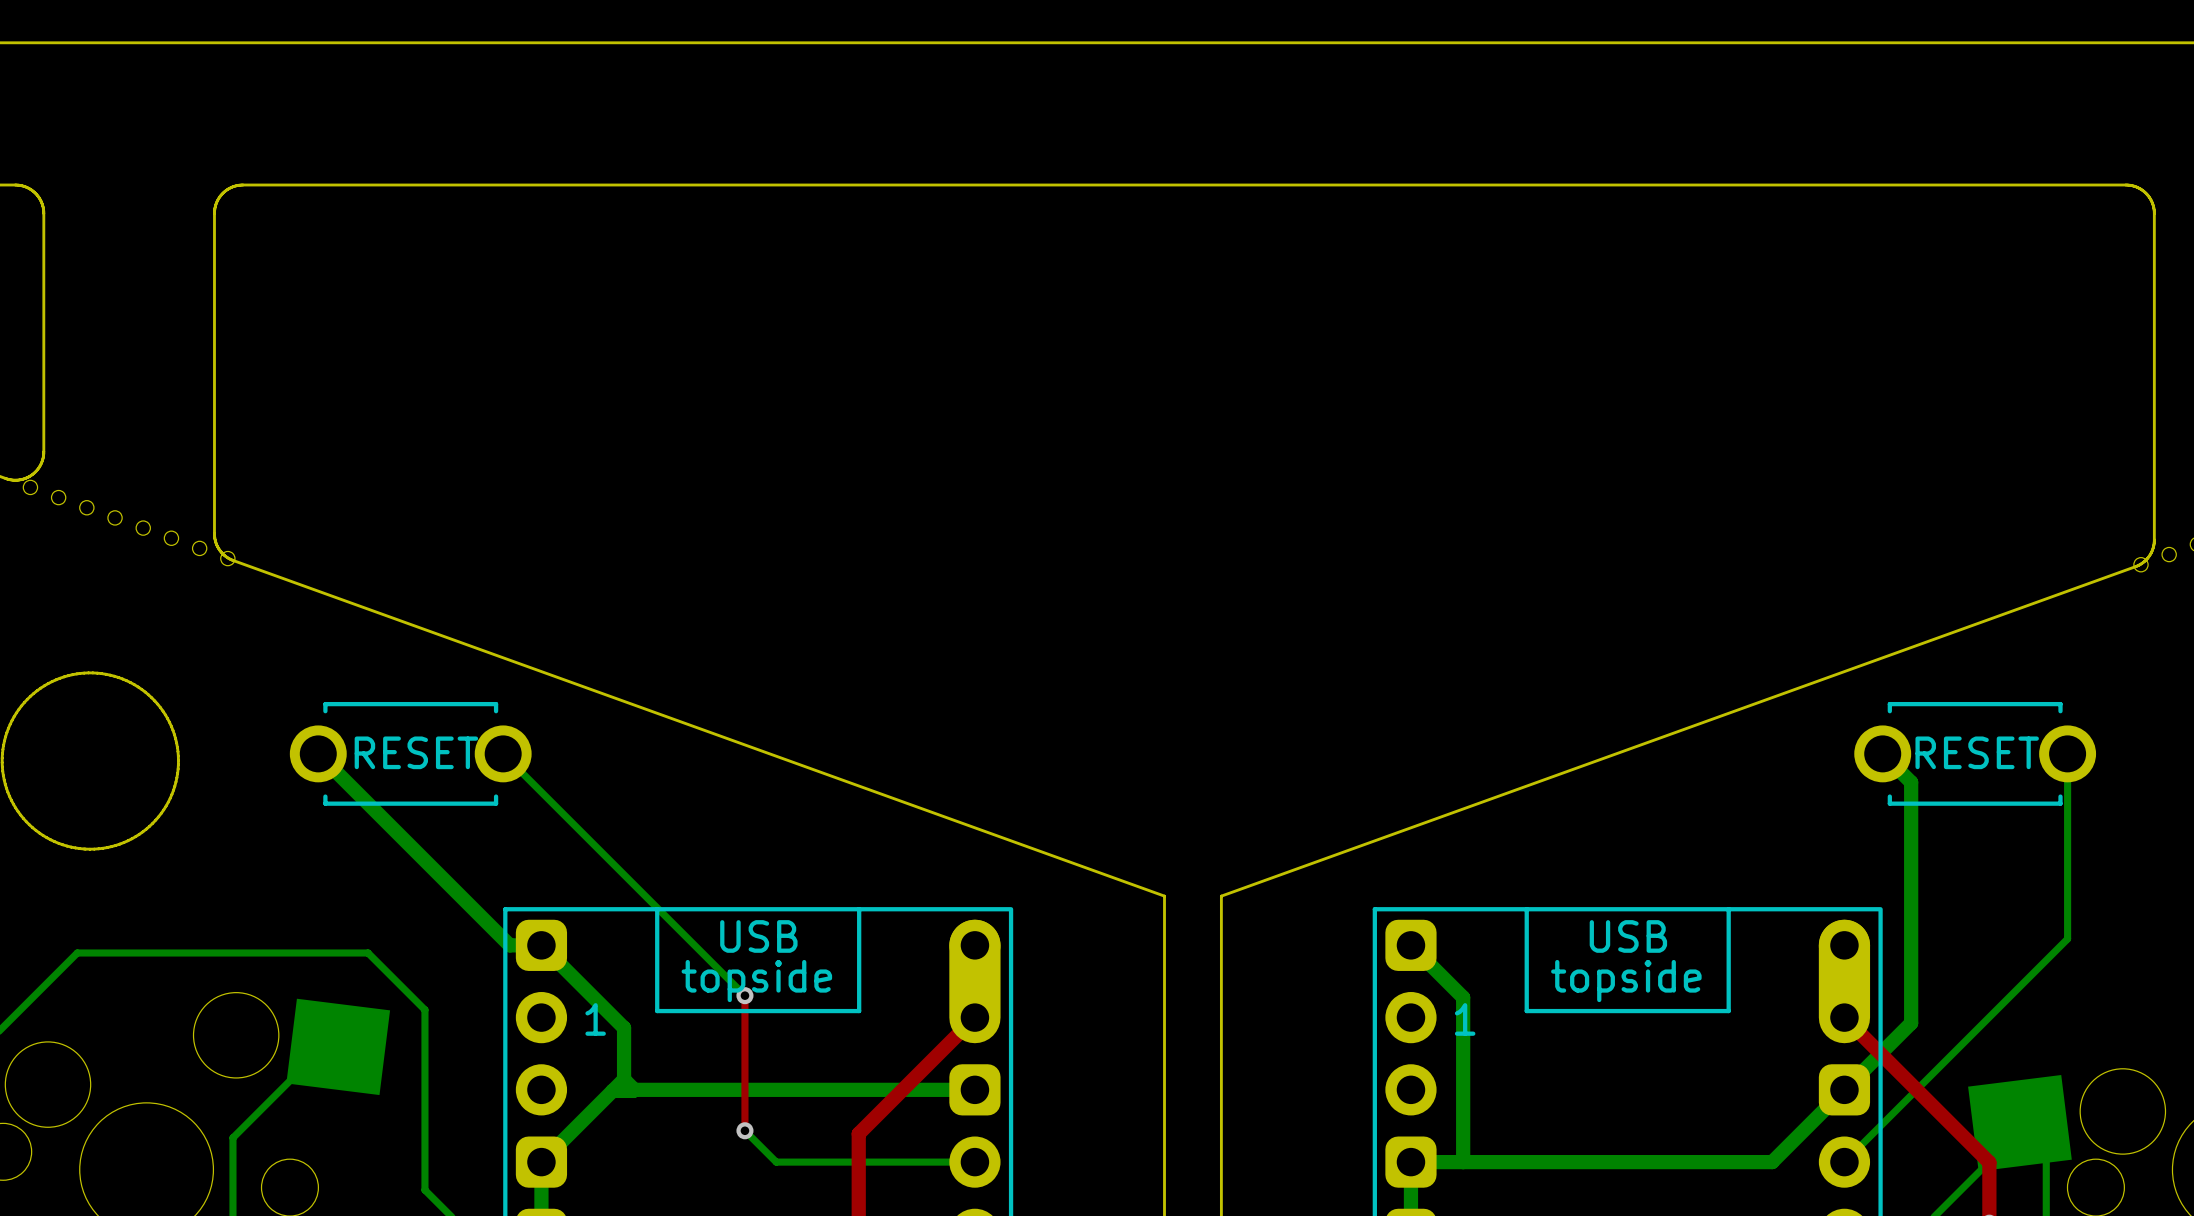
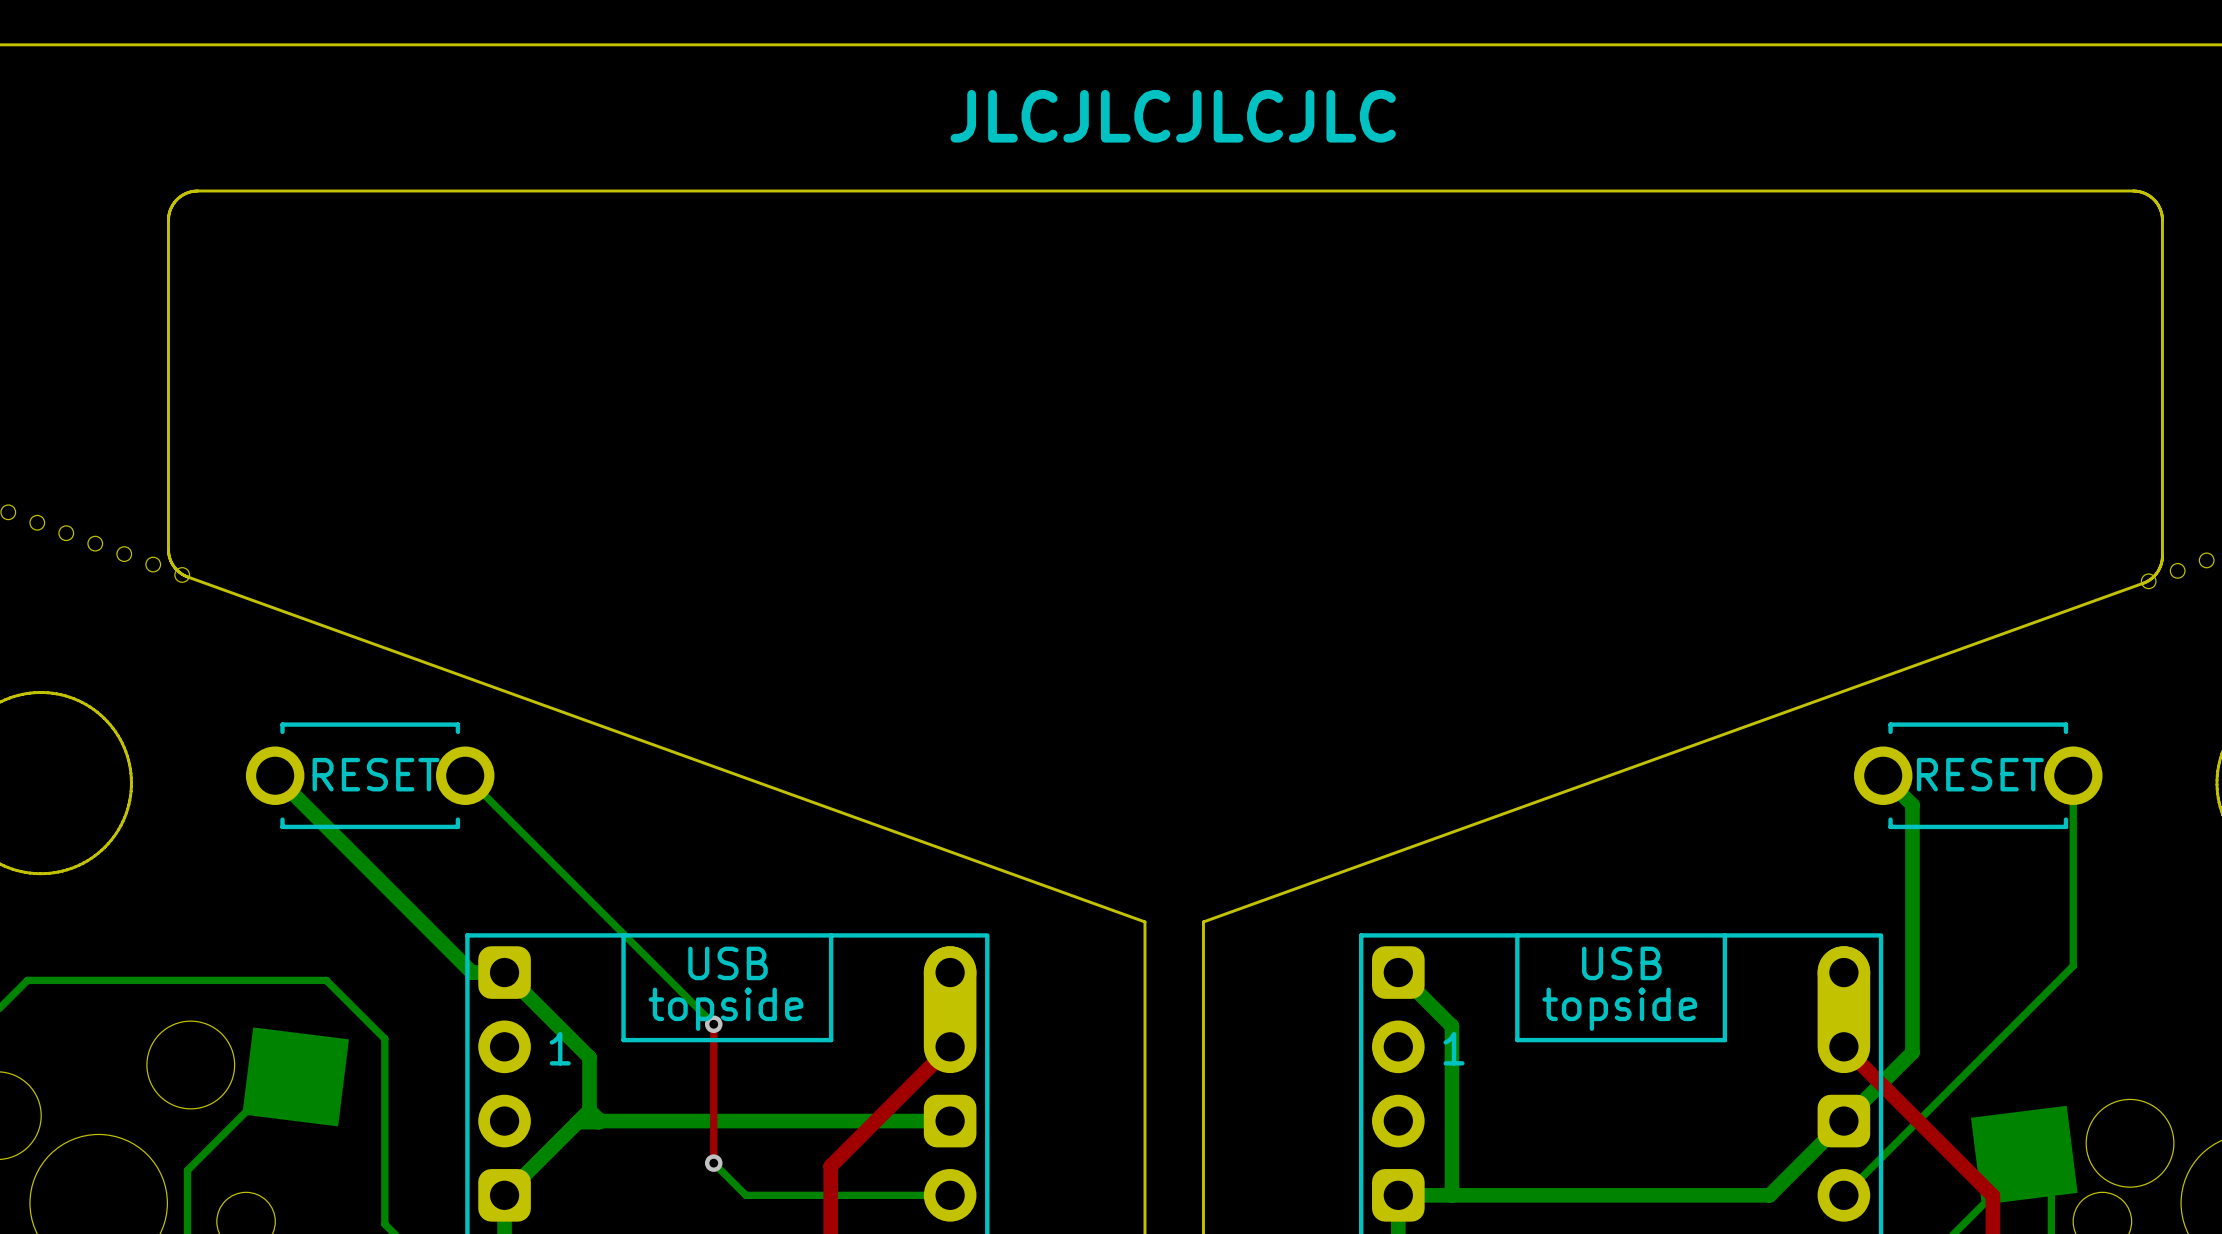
text: none -> JLCJLCJLCJLC (1173, 116)

